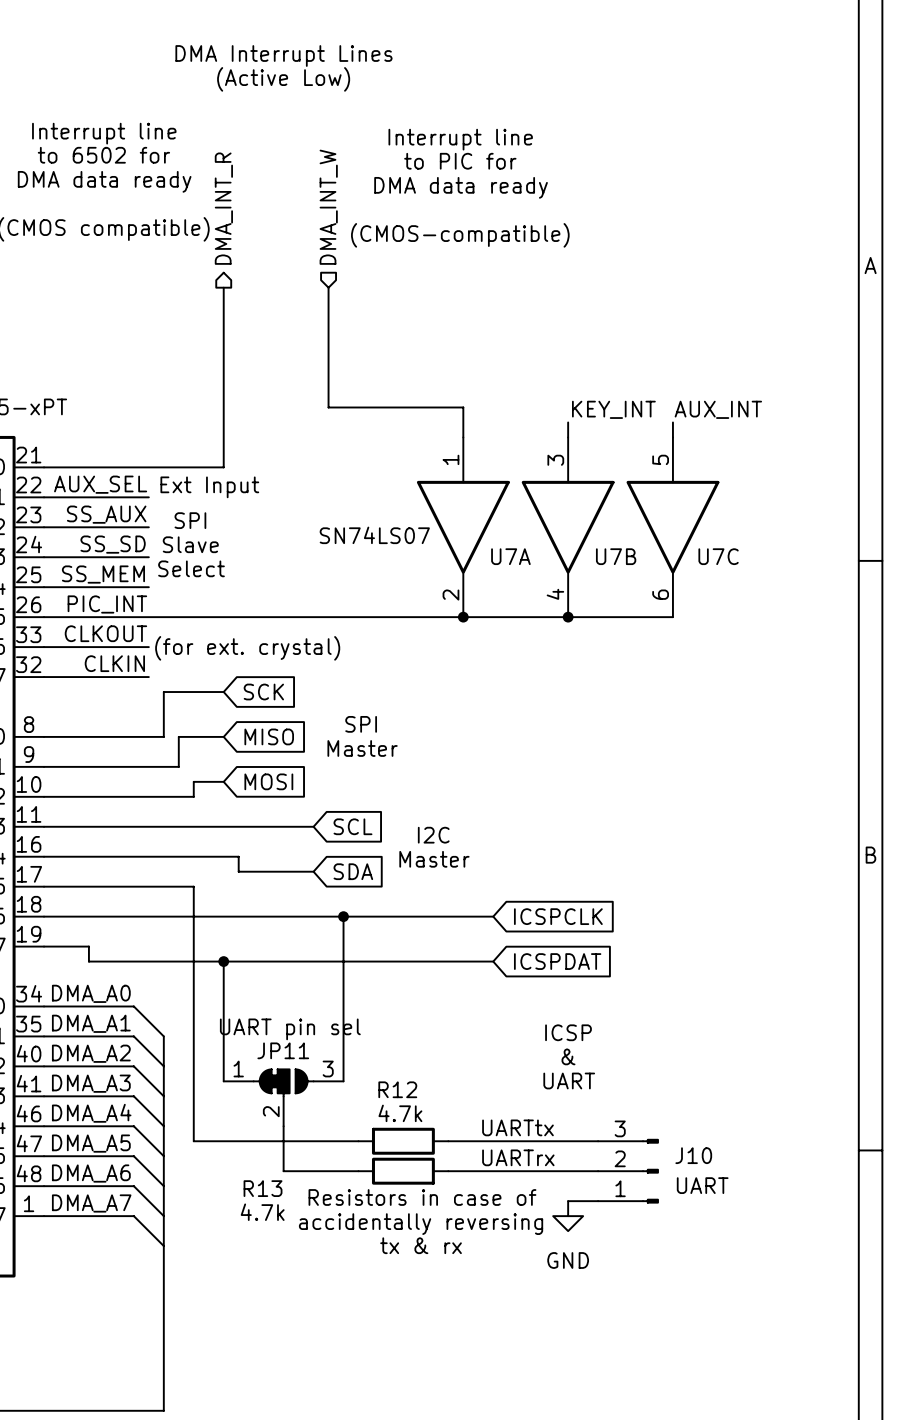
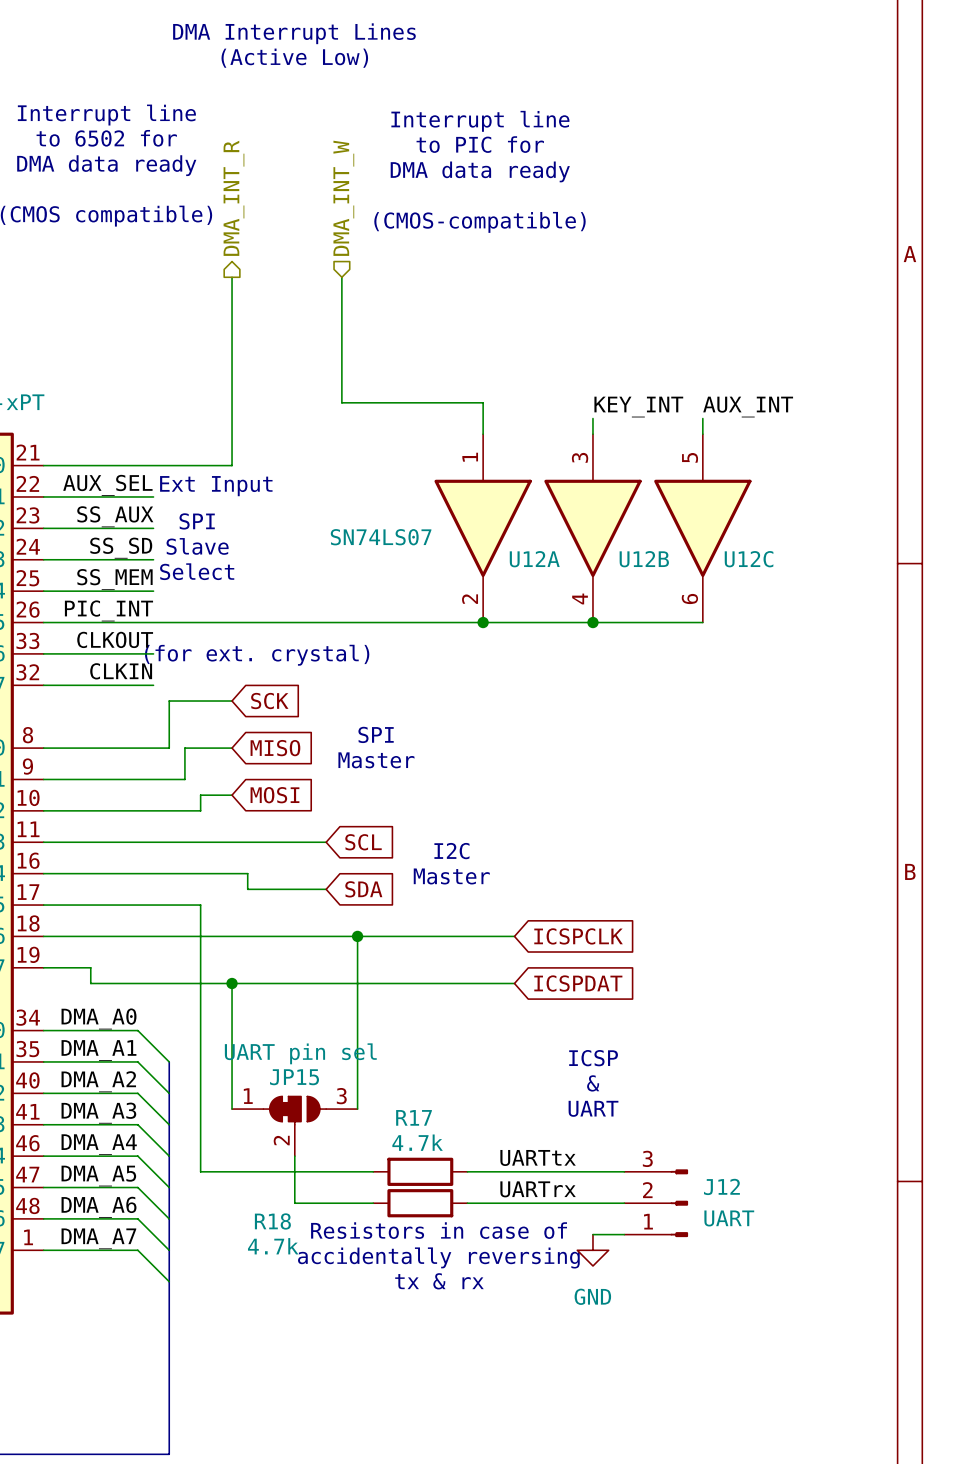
U7A name: U7A (510, 556) -> U12A (534, 559)
U7B name: U7B (616, 556) -> U12B (644, 559)
U7C name: U7C (718, 556) -> U12C (749, 559)
JP11 name: JP11 (283, 1050) -> JP15 (294, 1077)
R12 name: R12 (397, 1089) -> R17 (414, 1117)
J10 name: J10 (693, 1155) -> J12 (721, 1186)
R13 name: R13 (263, 1188) -> R18 (272, 1221)

